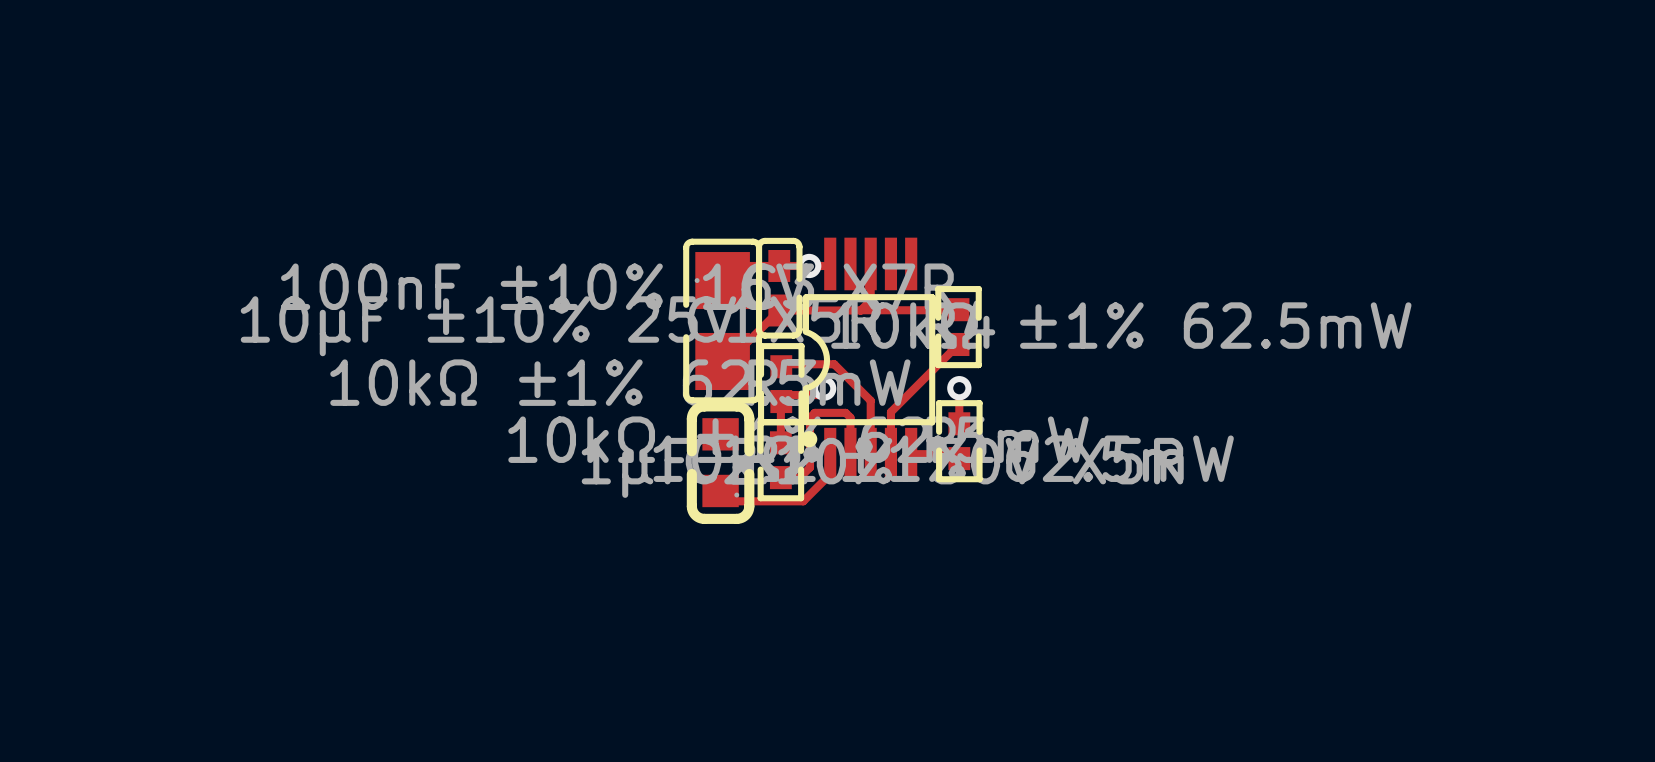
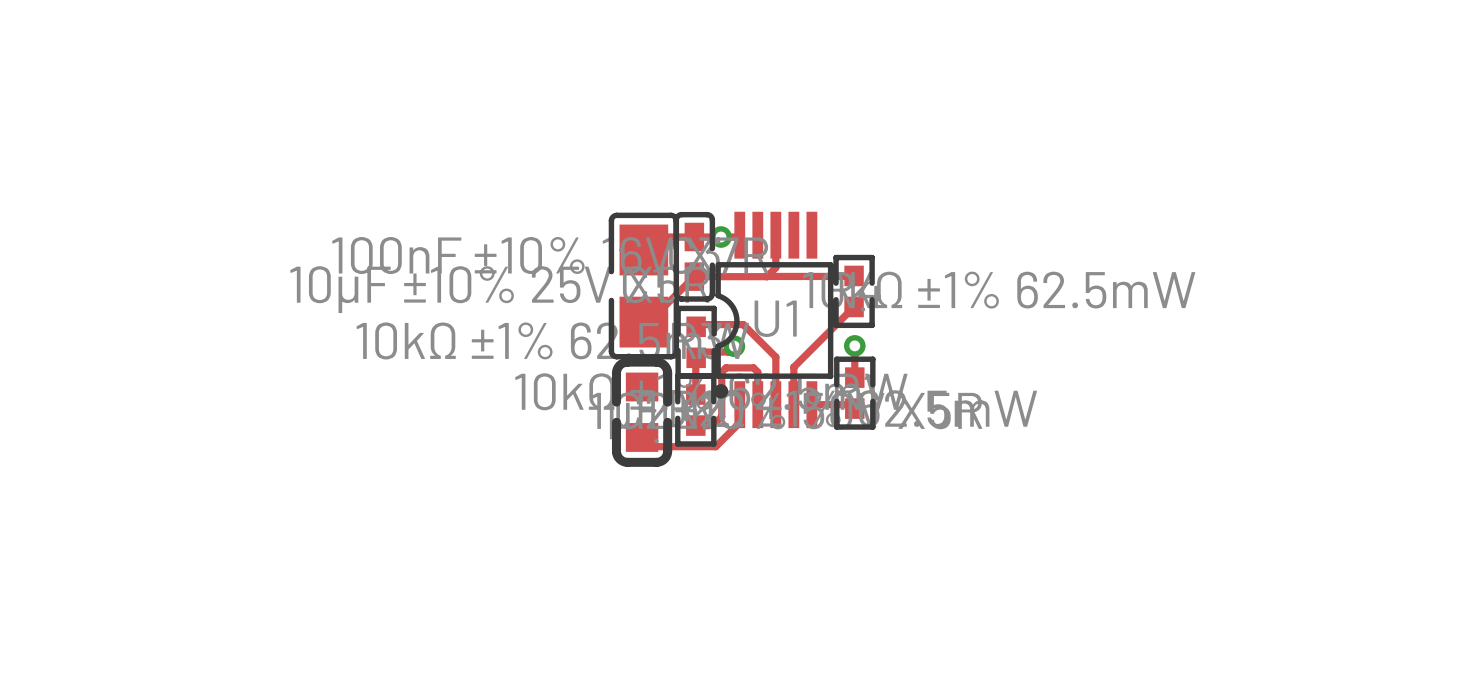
U1 name: none -> U1 (775, 318)

